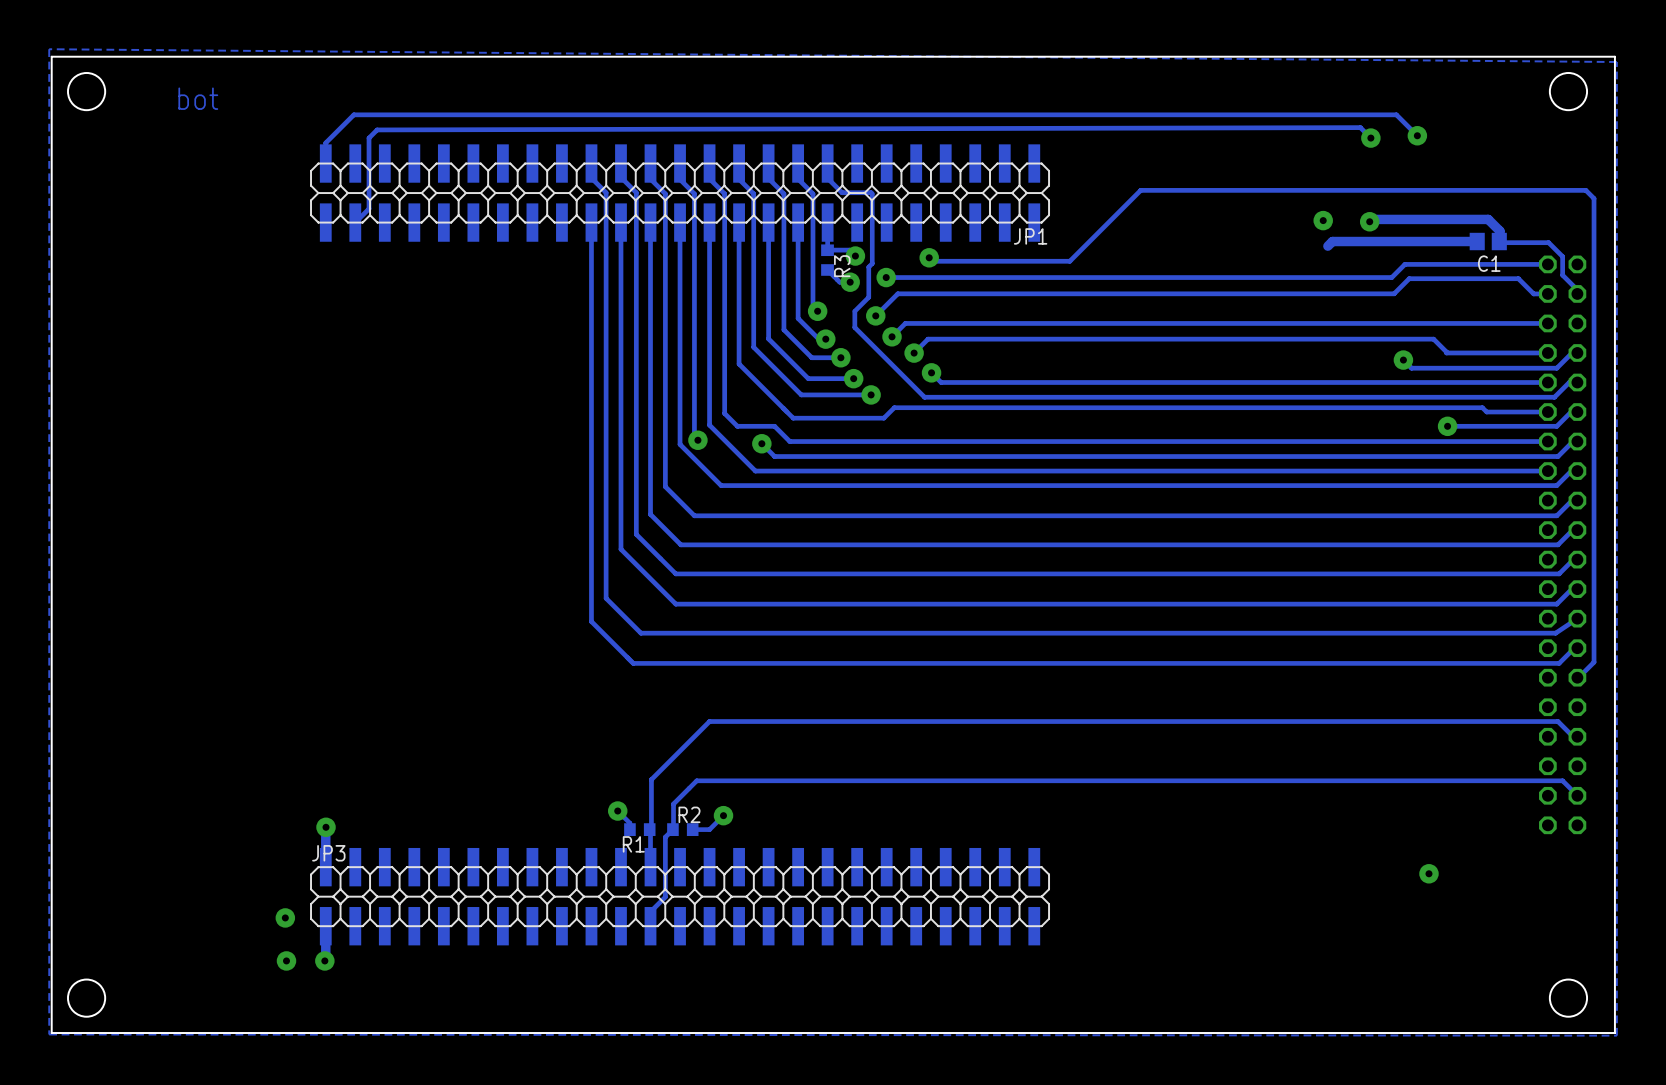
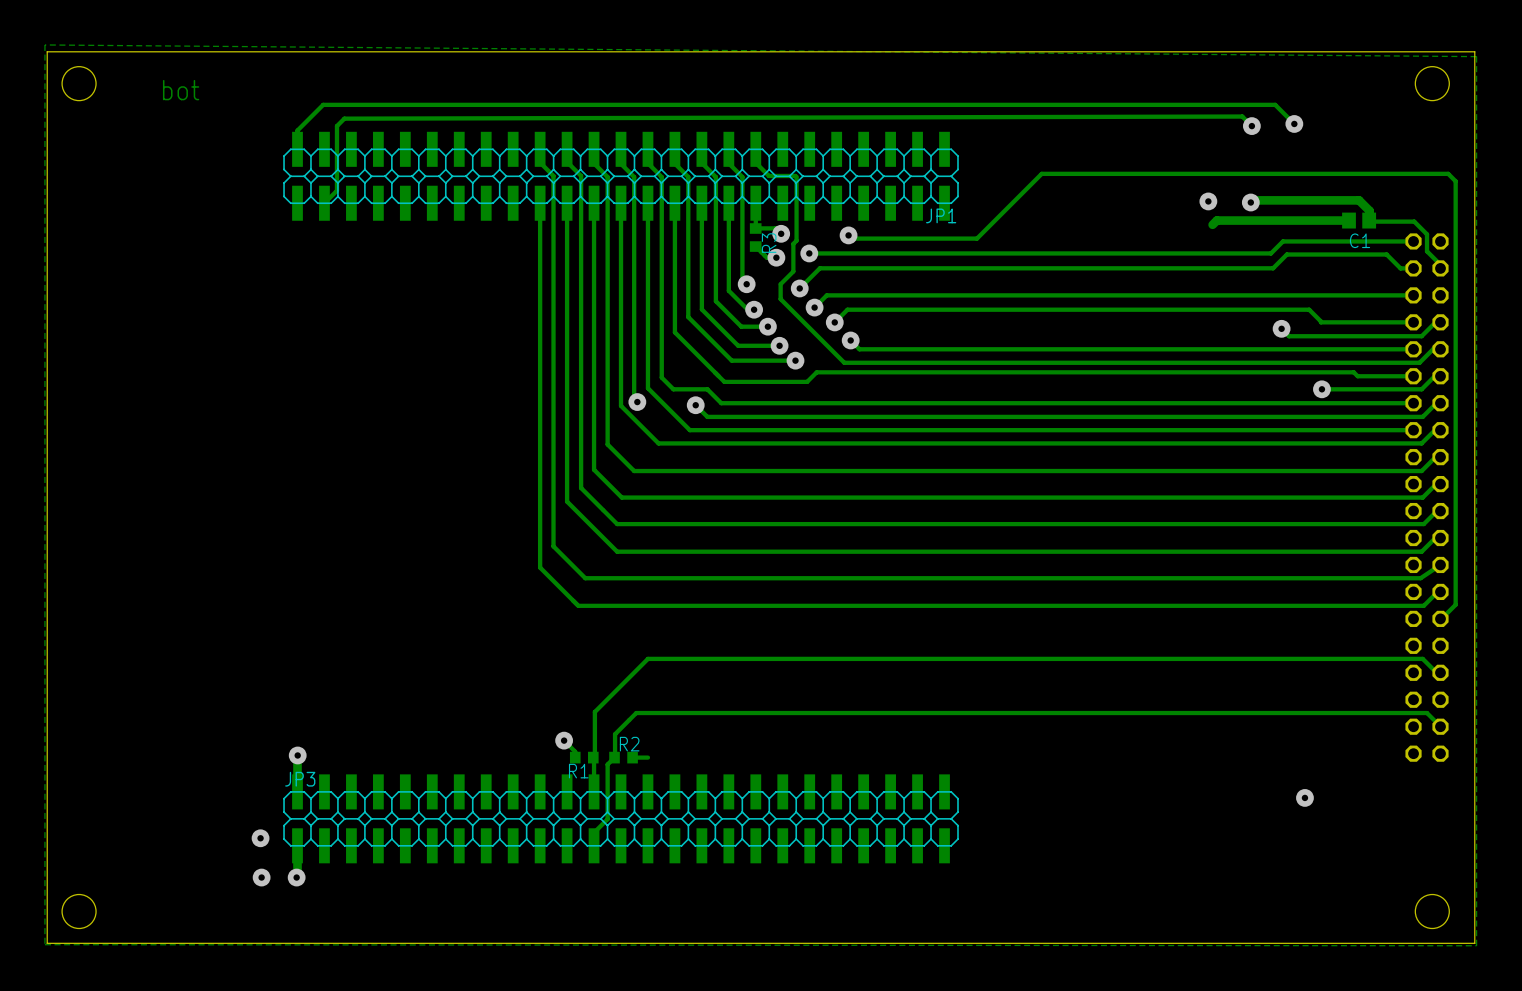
track: (723, 815) (709, 829) -> none
via: (723, 815) -> none

